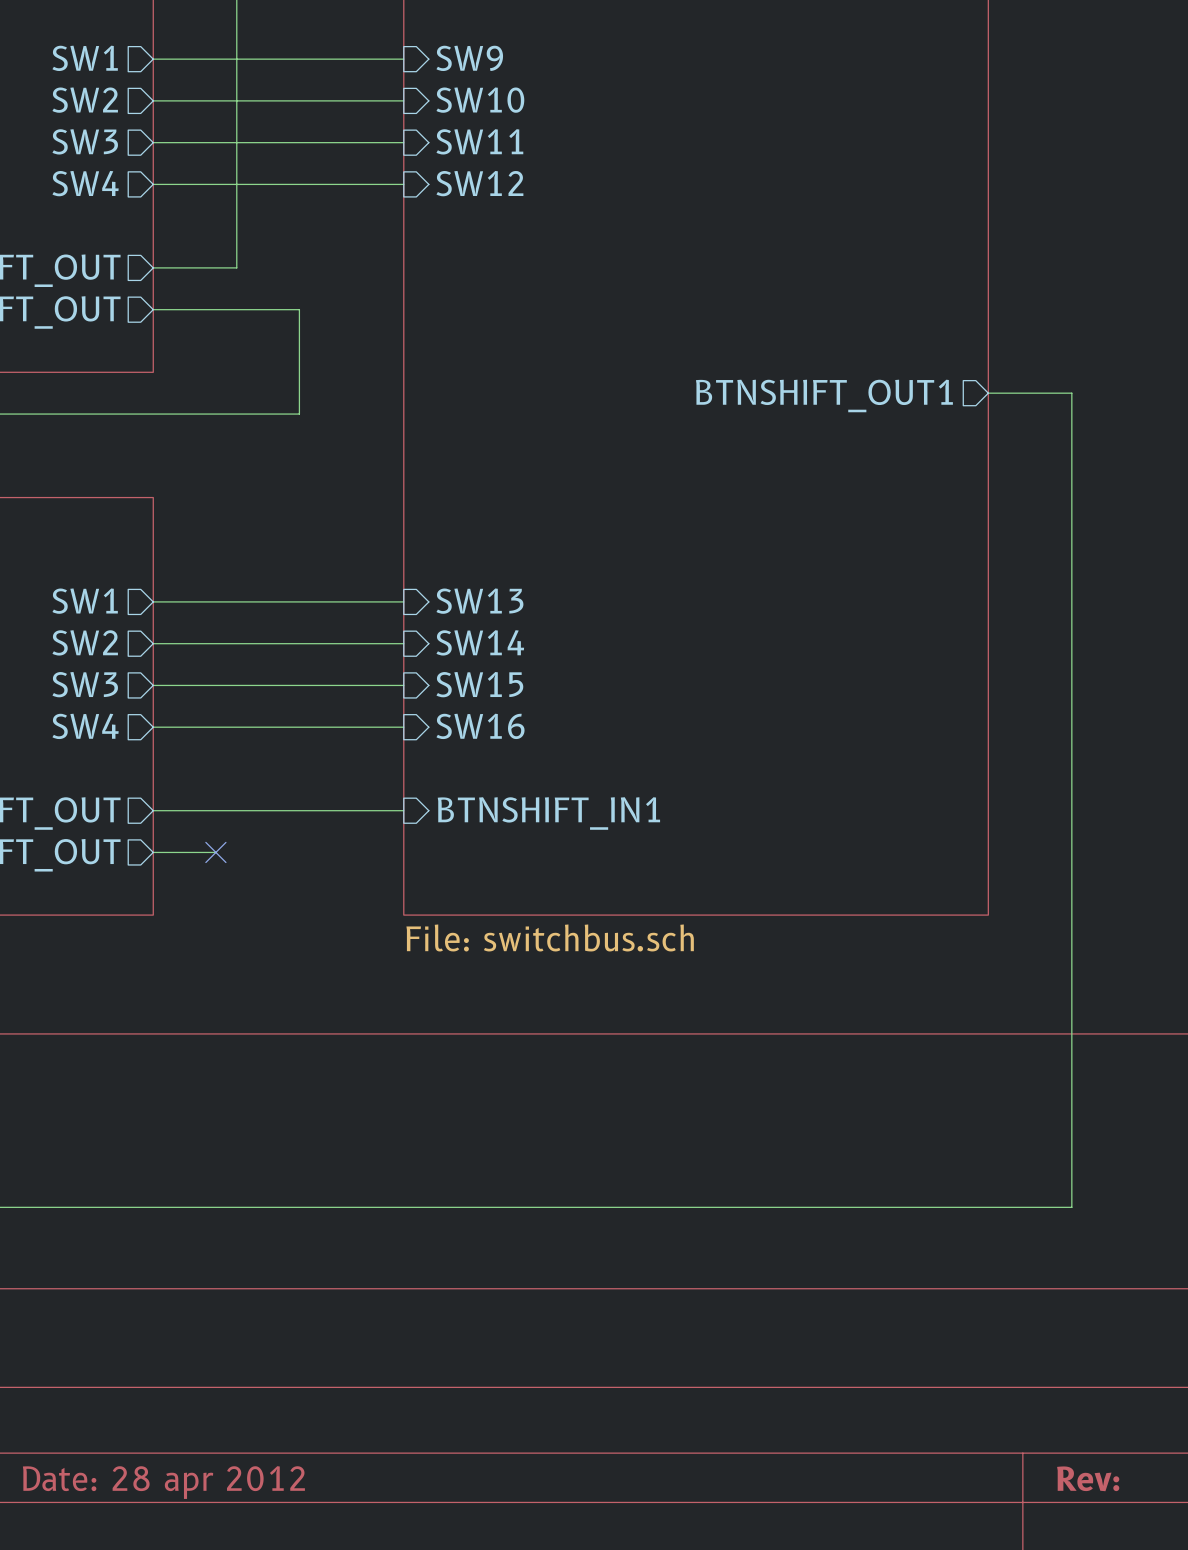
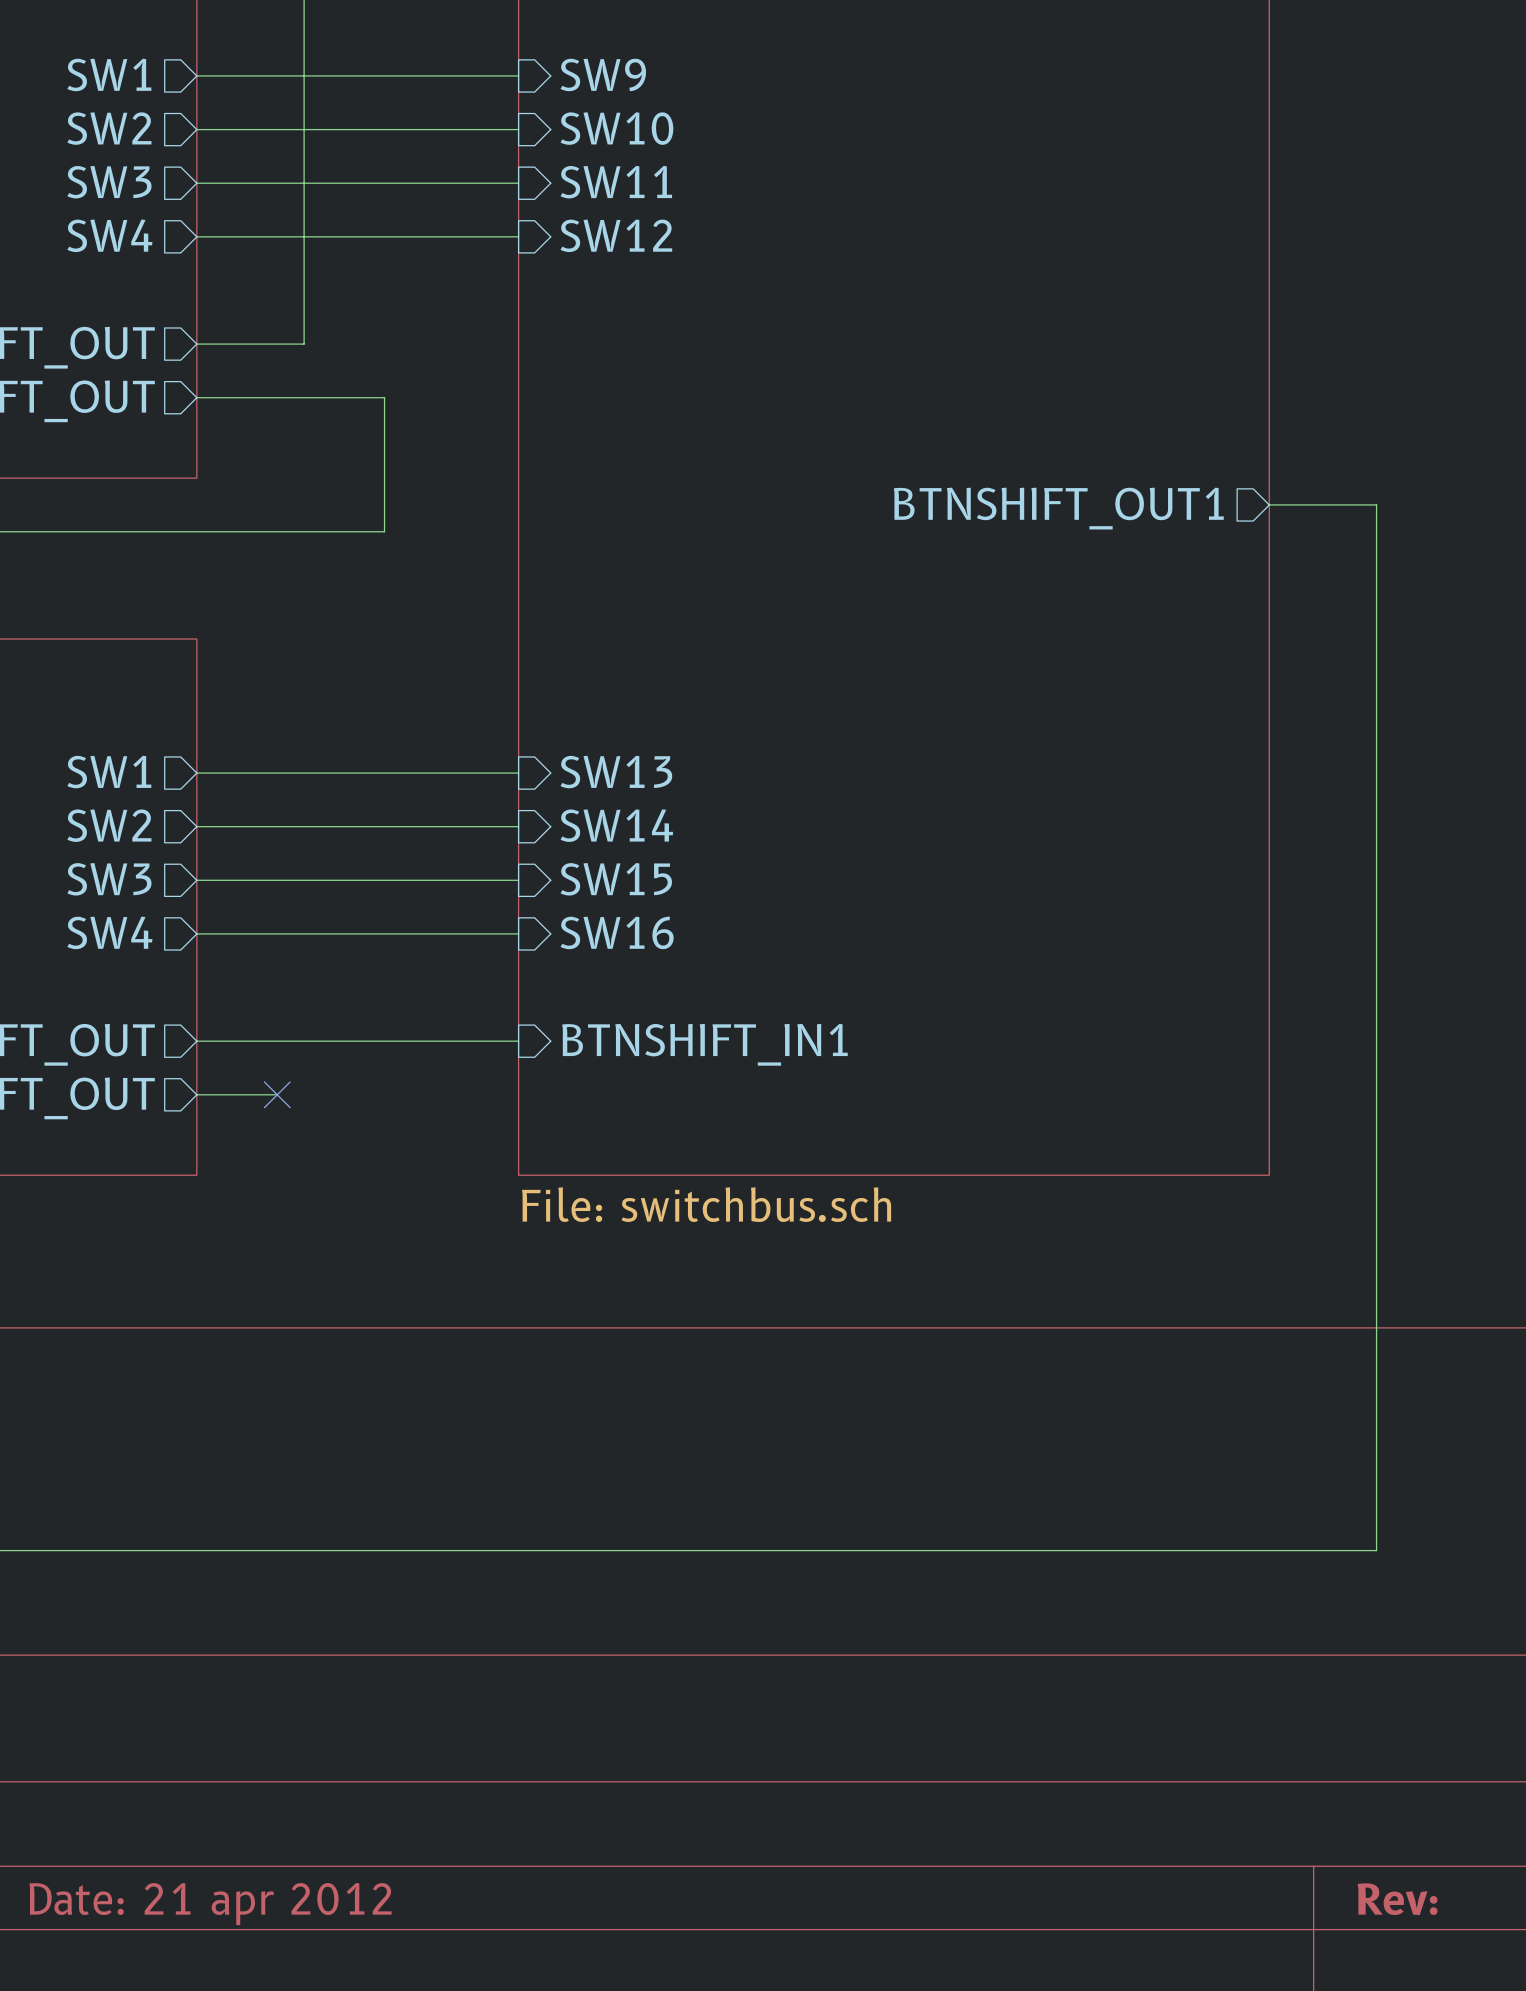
title block: Date: 28 apr 2012 (163, 1482) -> Date: 21 apr 2012 (210, 1904)

